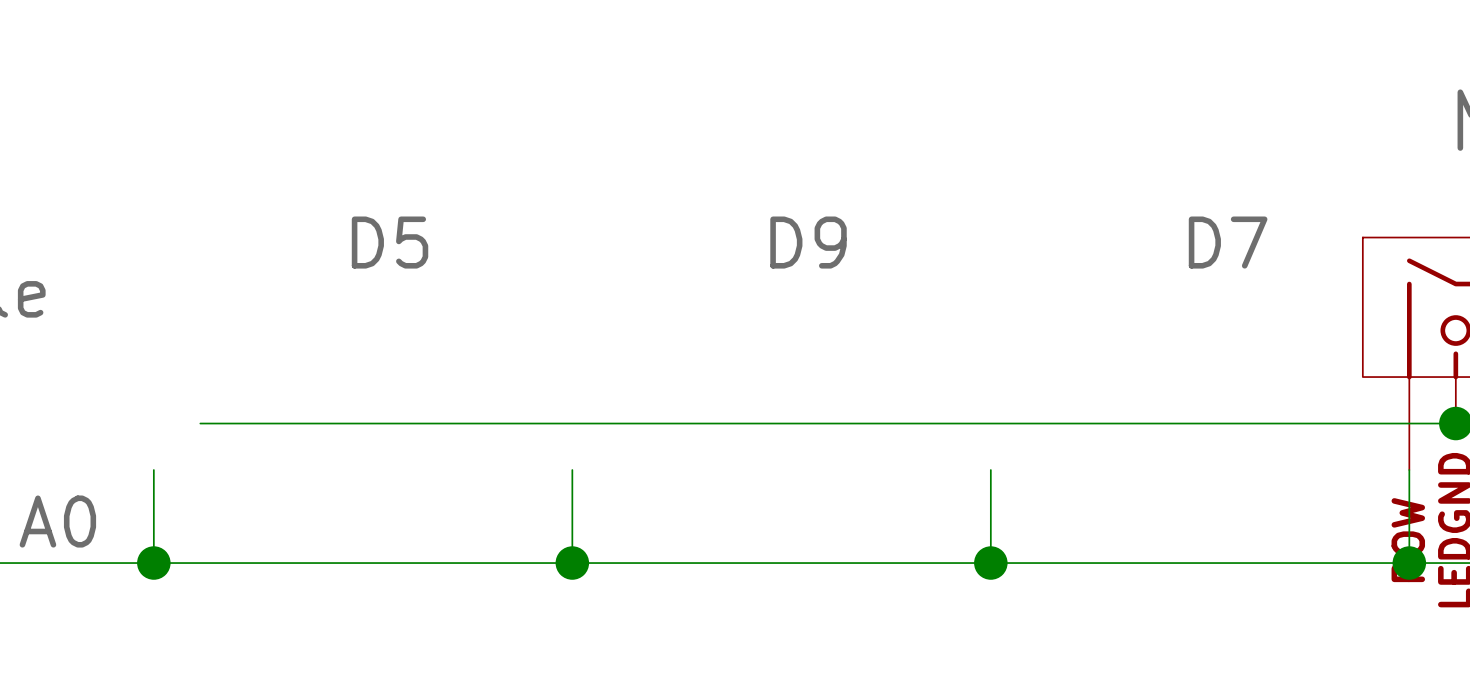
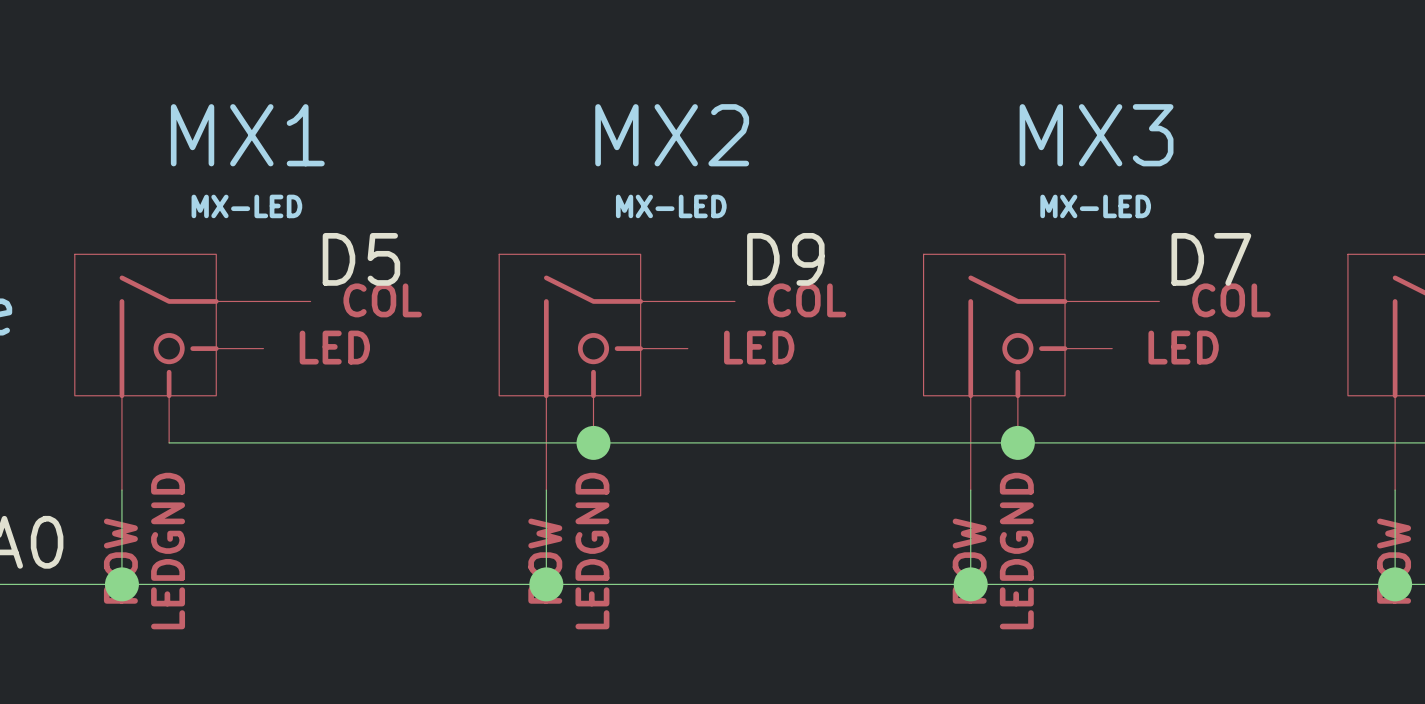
MX1: none -> MX-LED (192, 372)
MX2: none -> MX-LED (617, 372)
MX3: none -> MX-LED (1041, 372)
junction: none -> (593, 442)
junction: none -> (1017, 442)

